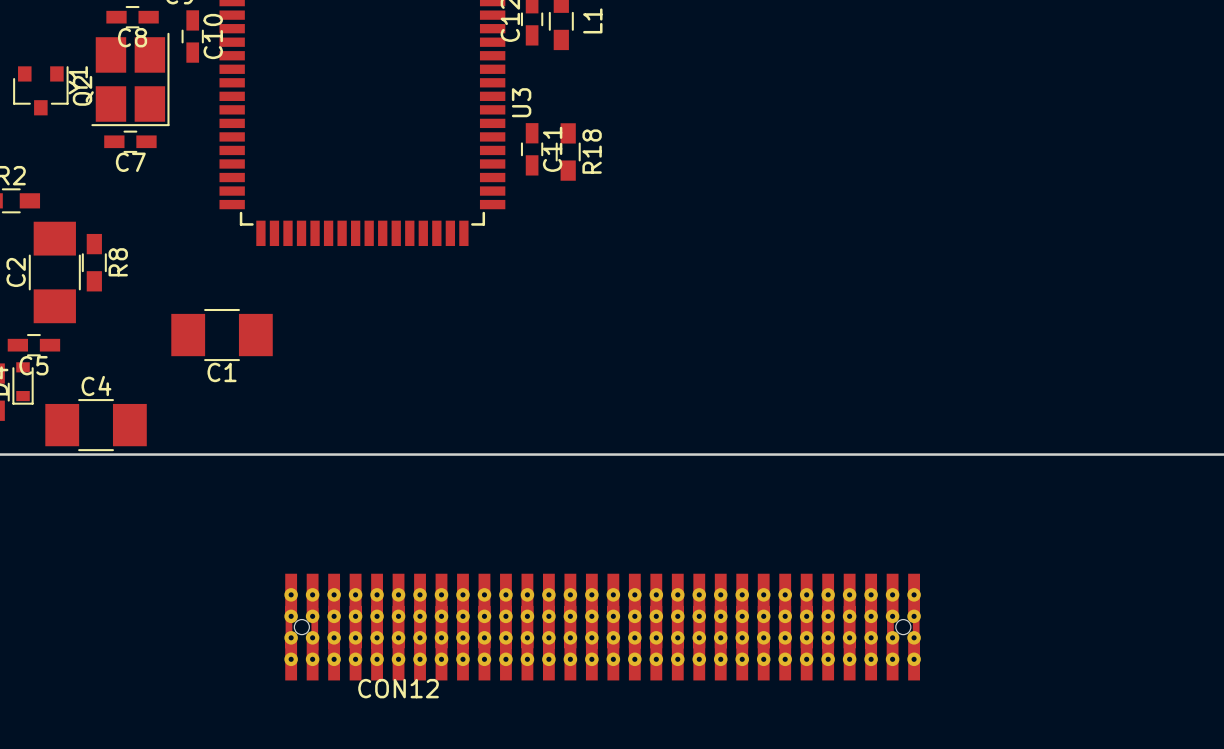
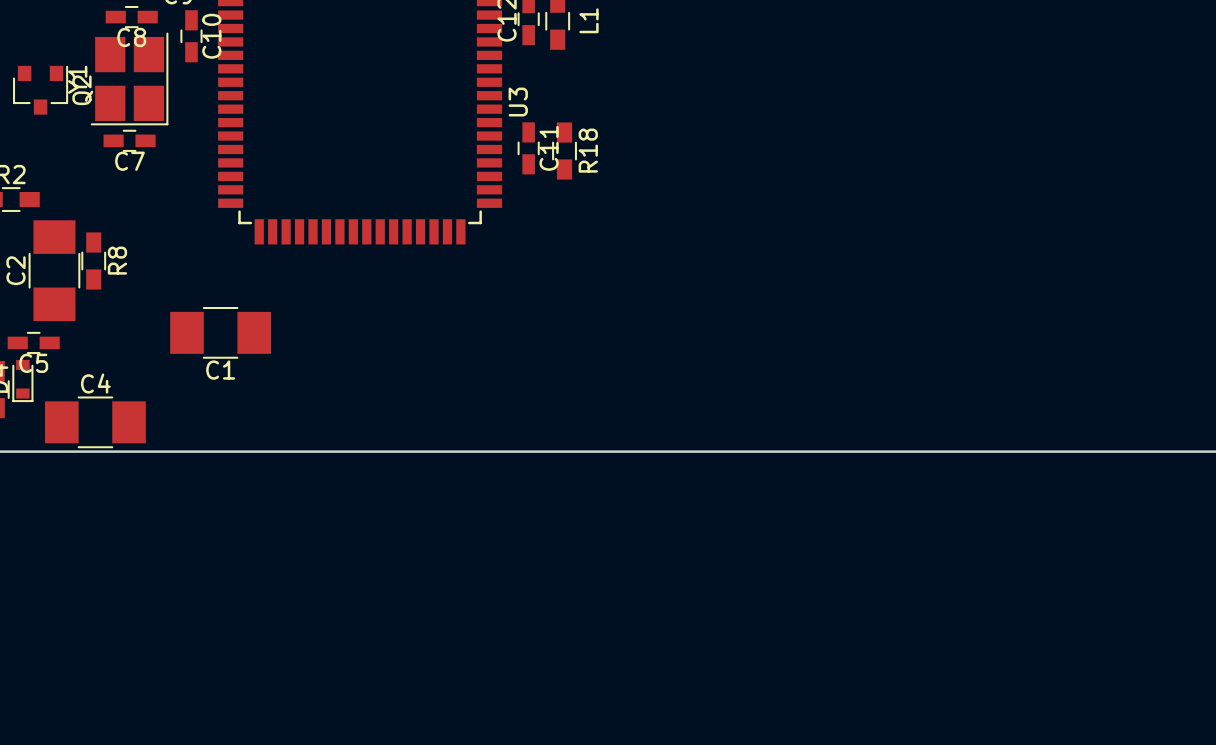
CON12: (602, 627) -> none

